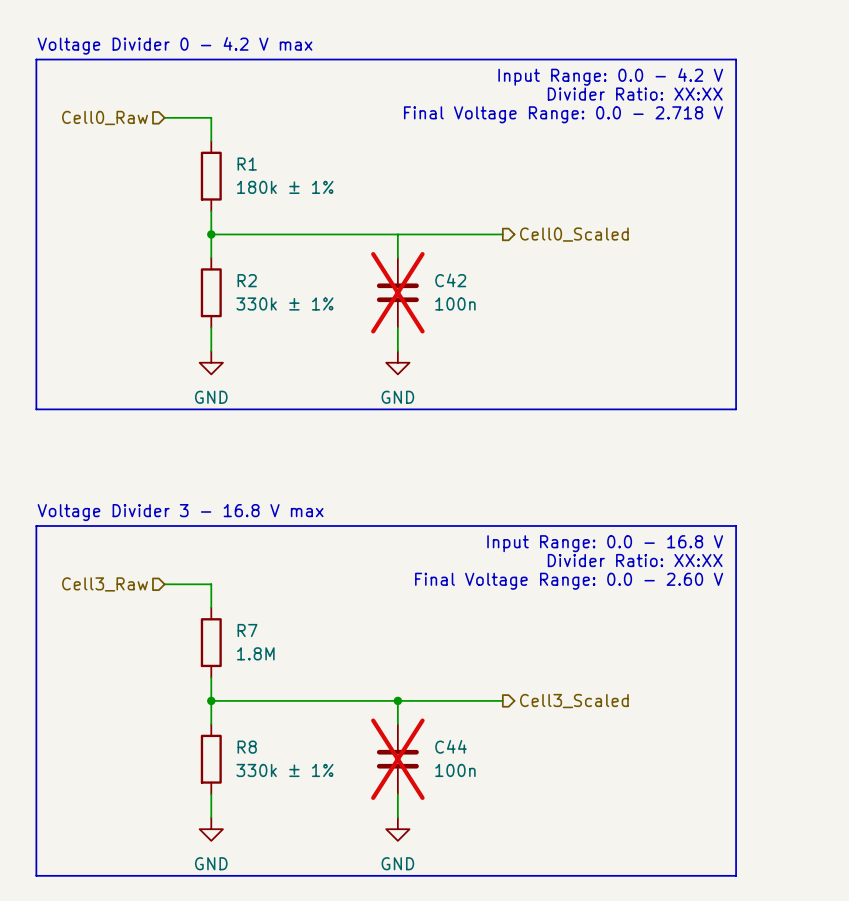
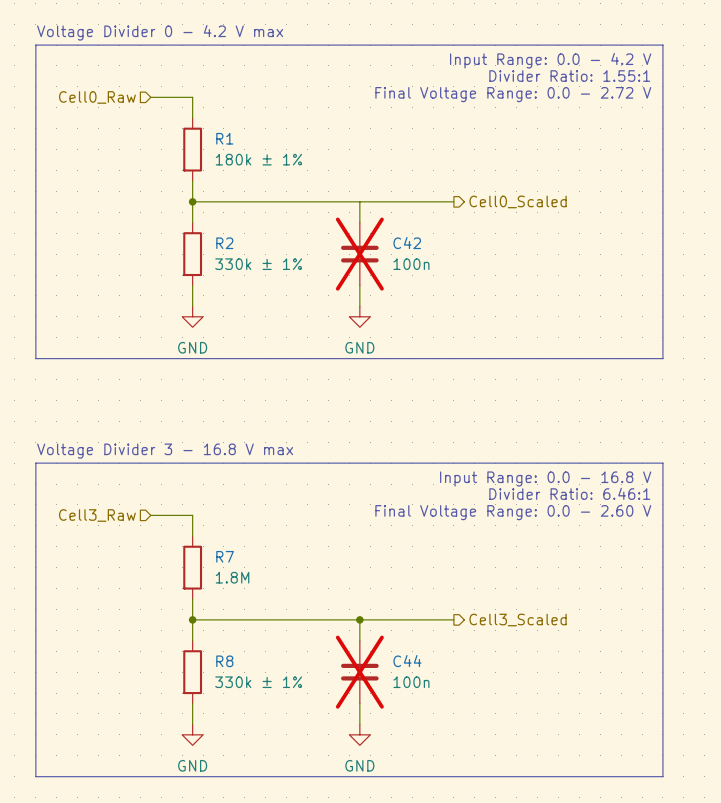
text: Divider Ratio: XX:XX (635, 94) -> Divider Ratio: 1.55:1 (569, 76)
text: Final Voltage Range: 0.0 - 2.718 V (563, 114) -> Final Voltage Range: 0.0 - 2.72 V (513, 94)
text: Divider Ratio: XX:XX (635, 560) -> Divider Ratio: 6.46:1 (569, 493)

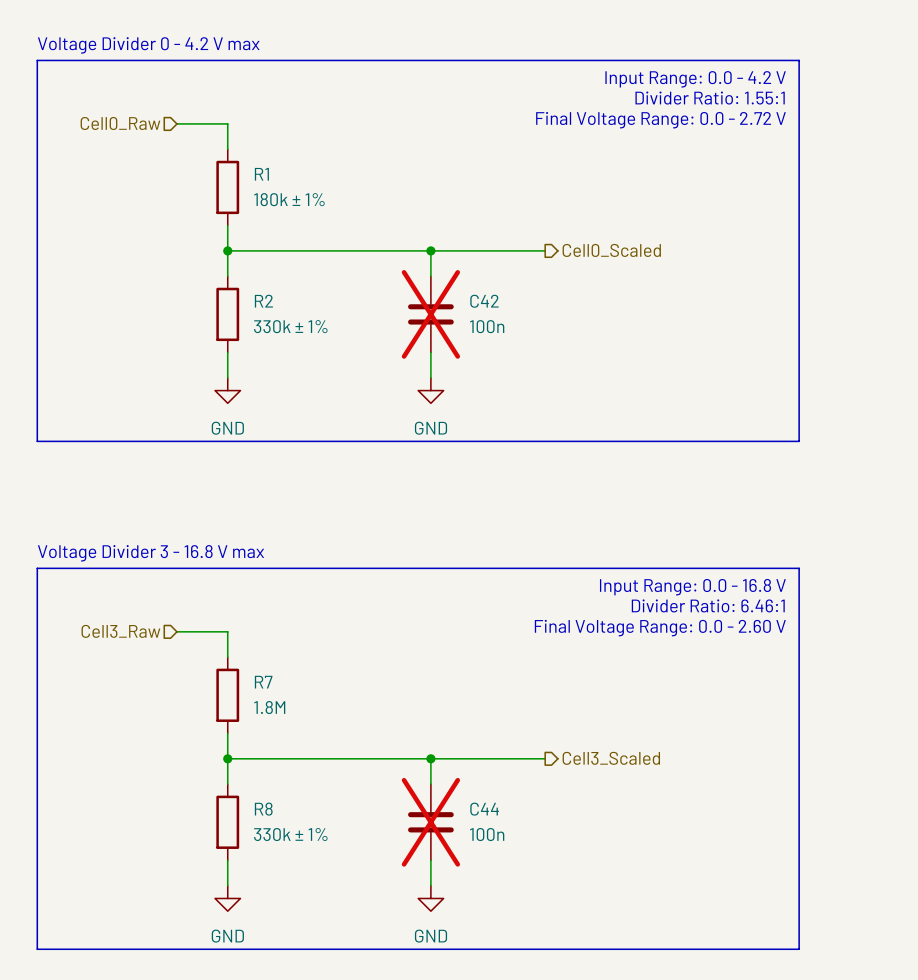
junction: none -> (430, 250)

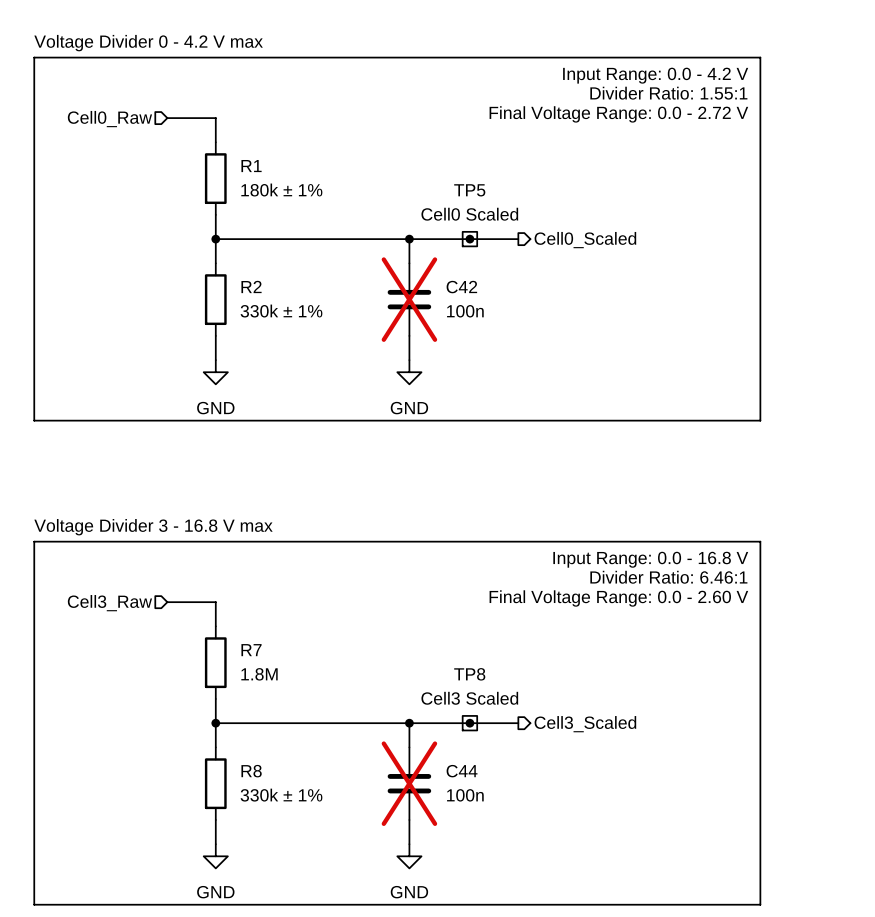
junction: none -> (469, 239)
TP5: none -> Cell0 Scaled (469, 239)
junction: none -> (469, 723)
TP8: none -> Cell3 Scaled (469, 723)

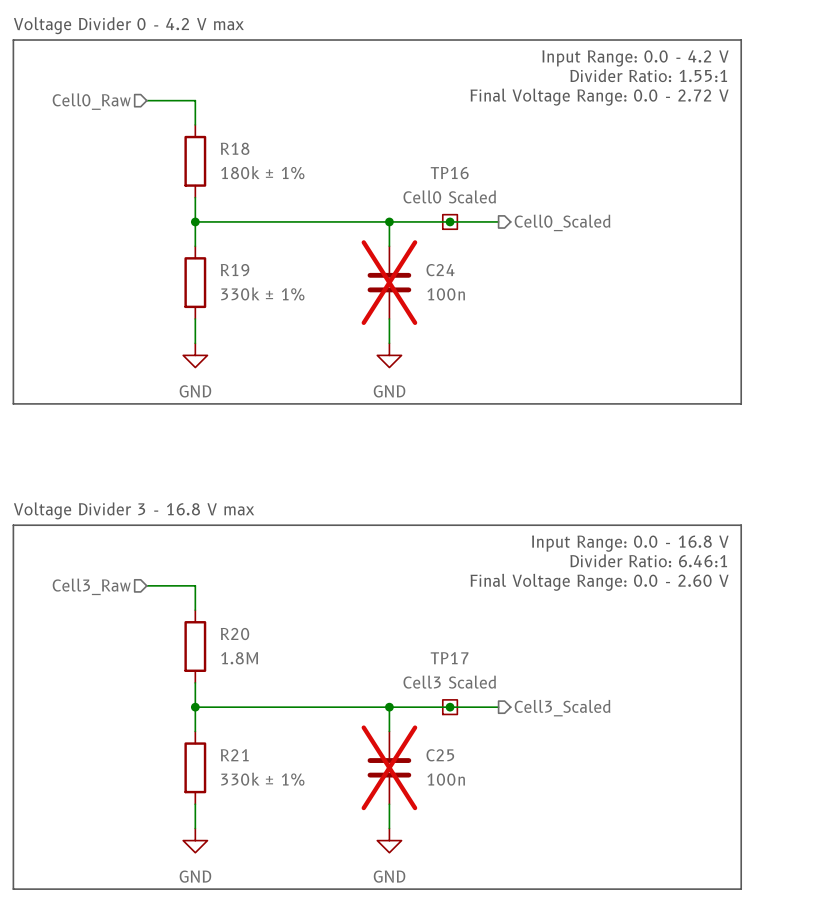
R1 name: R1 (251, 166) -> R18 (235, 148)
TP5 name: TP5 (469, 190) -> TP16 (449, 173)
R2 name: R2 (251, 286) -> R19 (235, 270)
C42 name: C42 (461, 287) -> C24 (440, 270)
R7 name: R7 (251, 650) -> R20 (235, 634)
TP8 name: TP8 (469, 674) -> TP17 (449, 658)
R8 name: R8 (251, 771) -> R21 (234, 755)
C44 name: C44 (462, 771) -> C25 (440, 755)

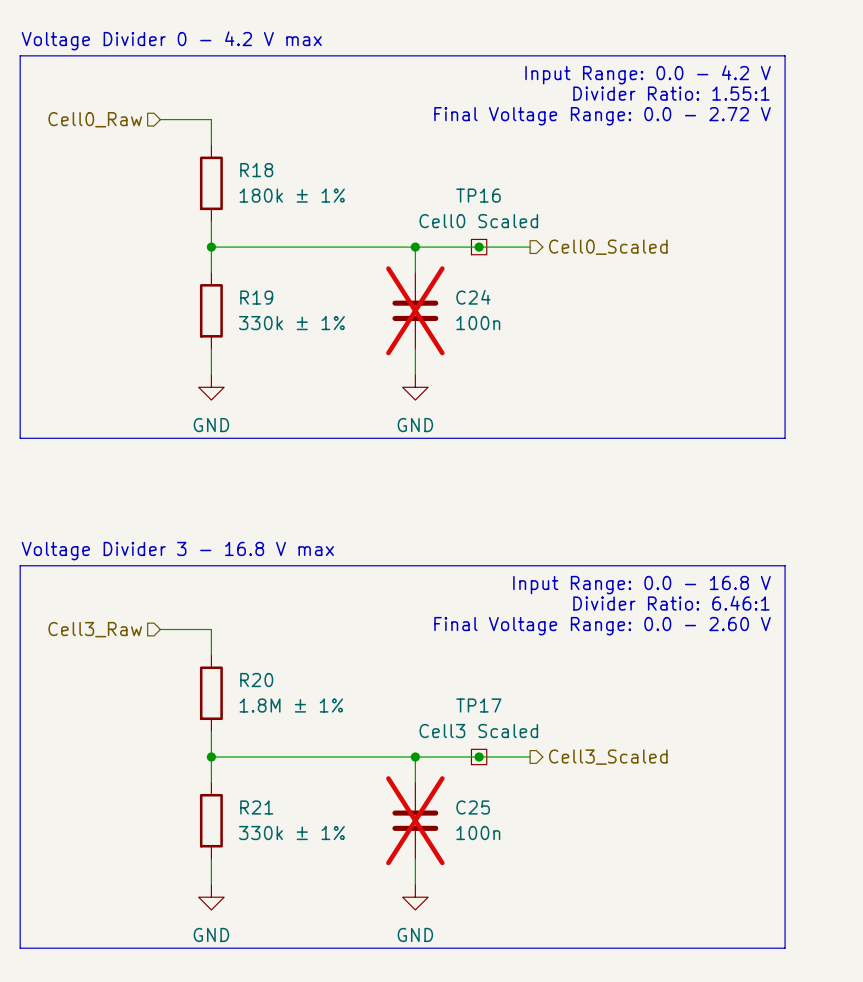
R20 value: 1.8M (239, 658) -> 1.8M ± 1% (291, 705)

